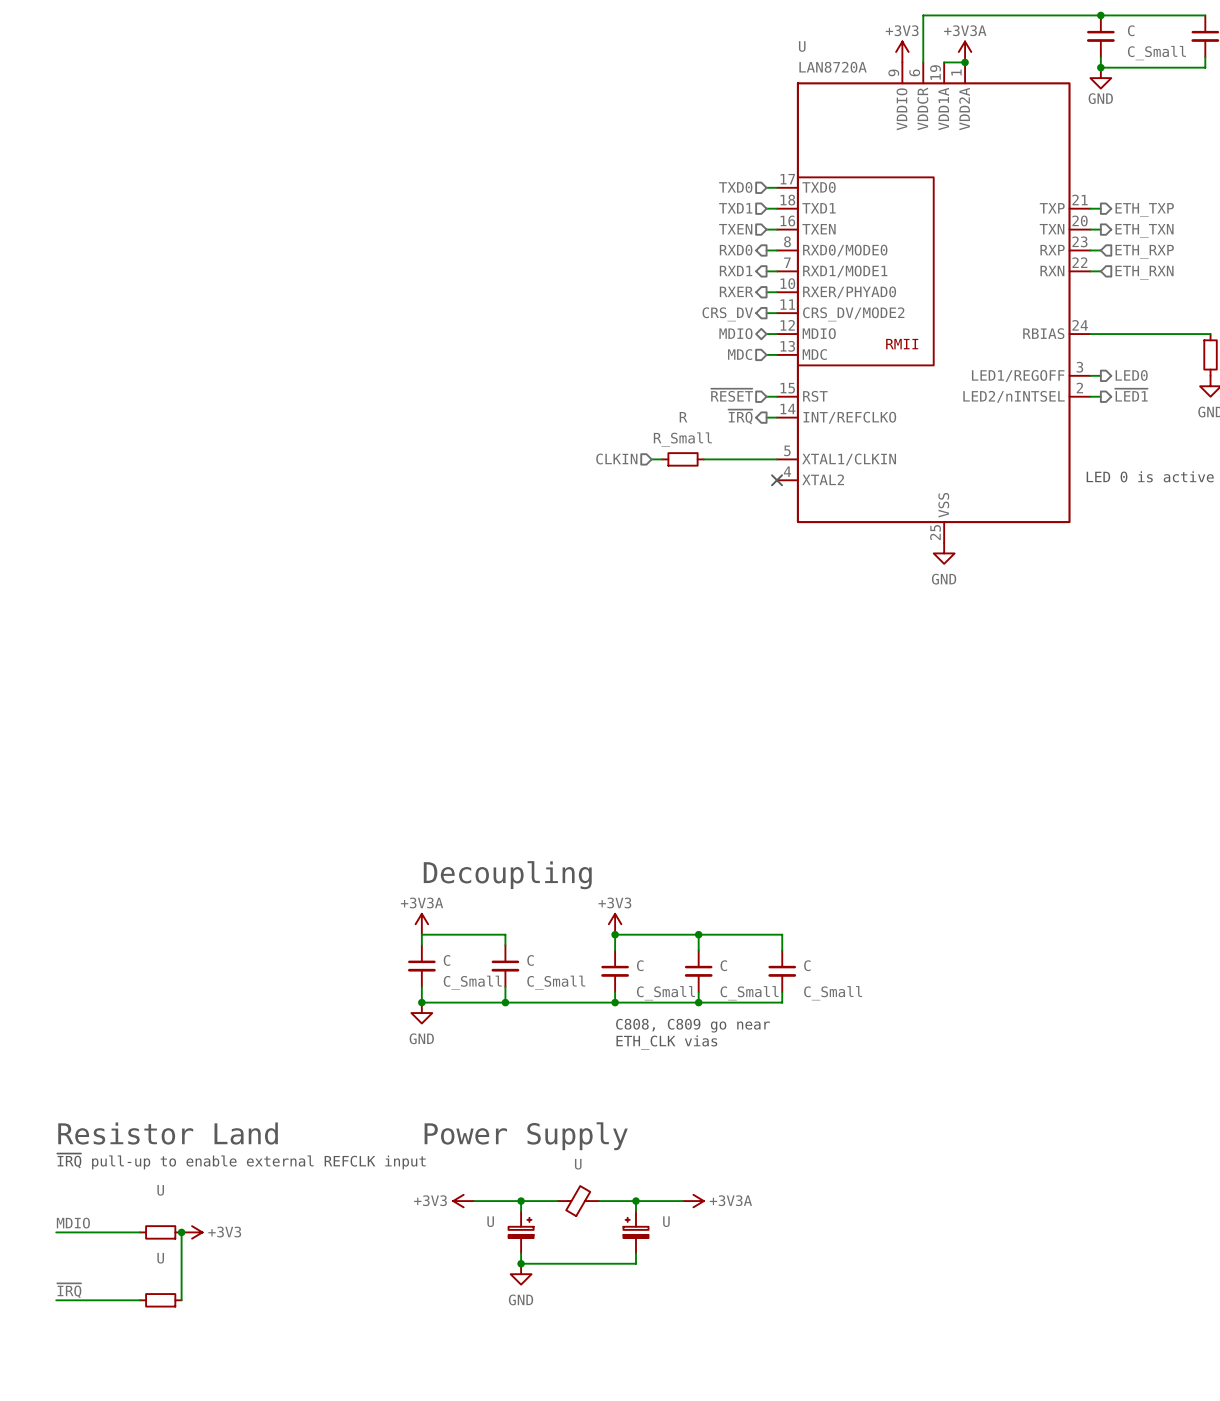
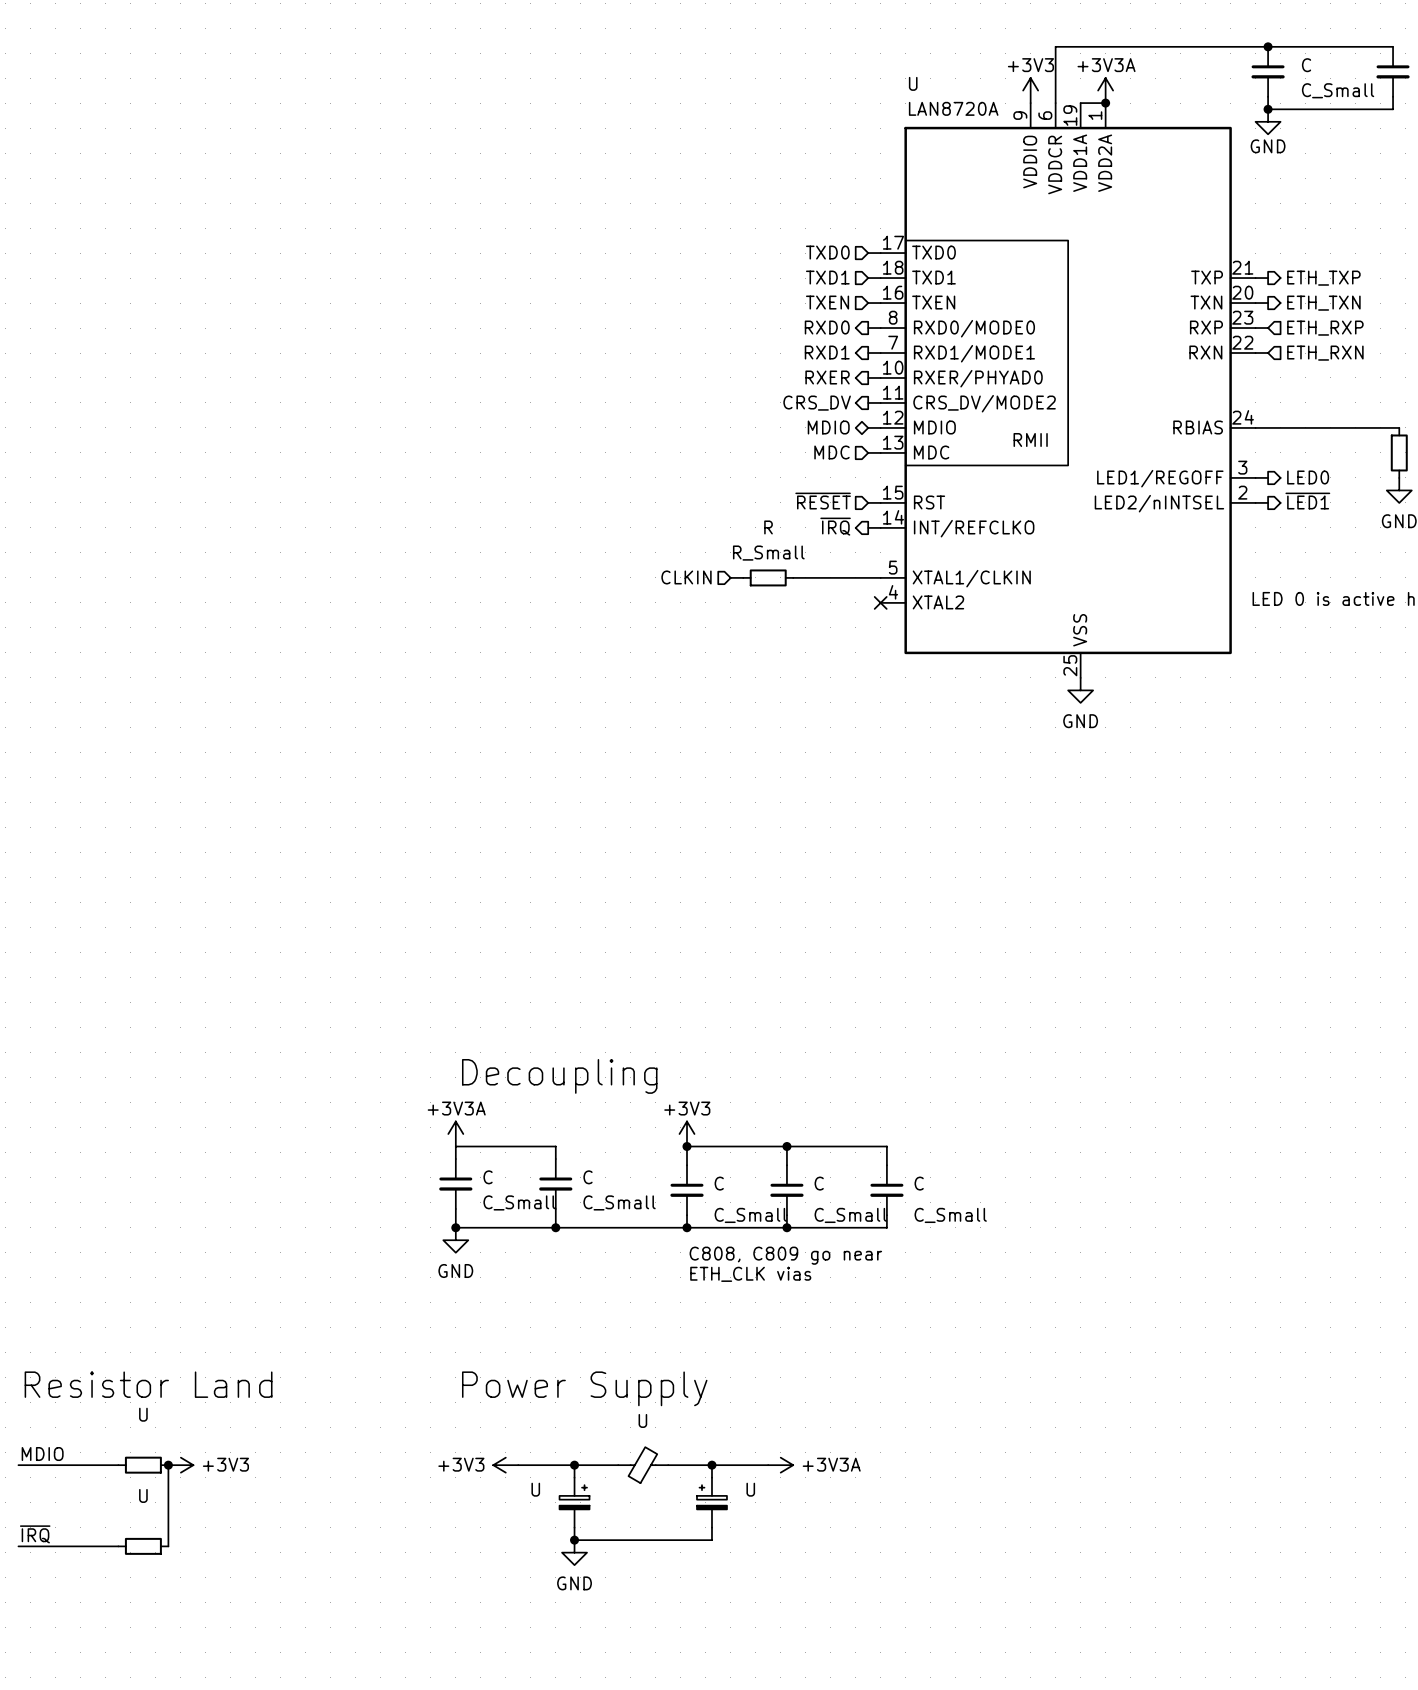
text: ~{IRQ} pull-up to enable external REFCLK input (241, 1161) -> none
U: none -> (143, 1465)
label position: MDIO (73, 1223) -> MDIO (42, 1454)
wire: (56, 1232) (139, 1232) -> (18, 1465) (118, 1465)
U: (160, 1232) -> none
junction position: (181, 1232) -> (168, 1465)
power symbol position: +3V3 (192, 1232) -> +3V3 (180, 1465)
U: none -> (143, 1546)
wire: (181, 1268) (181, 1300) -> (168, 1465) (168, 1502)
label position: ~{IRQ} (69, 1290) -> ~{IRQ} (35, 1534)
wire: (56, 1300) (139, 1300) -> (18, 1546) (118, 1546)
U: (160, 1300) -> none

